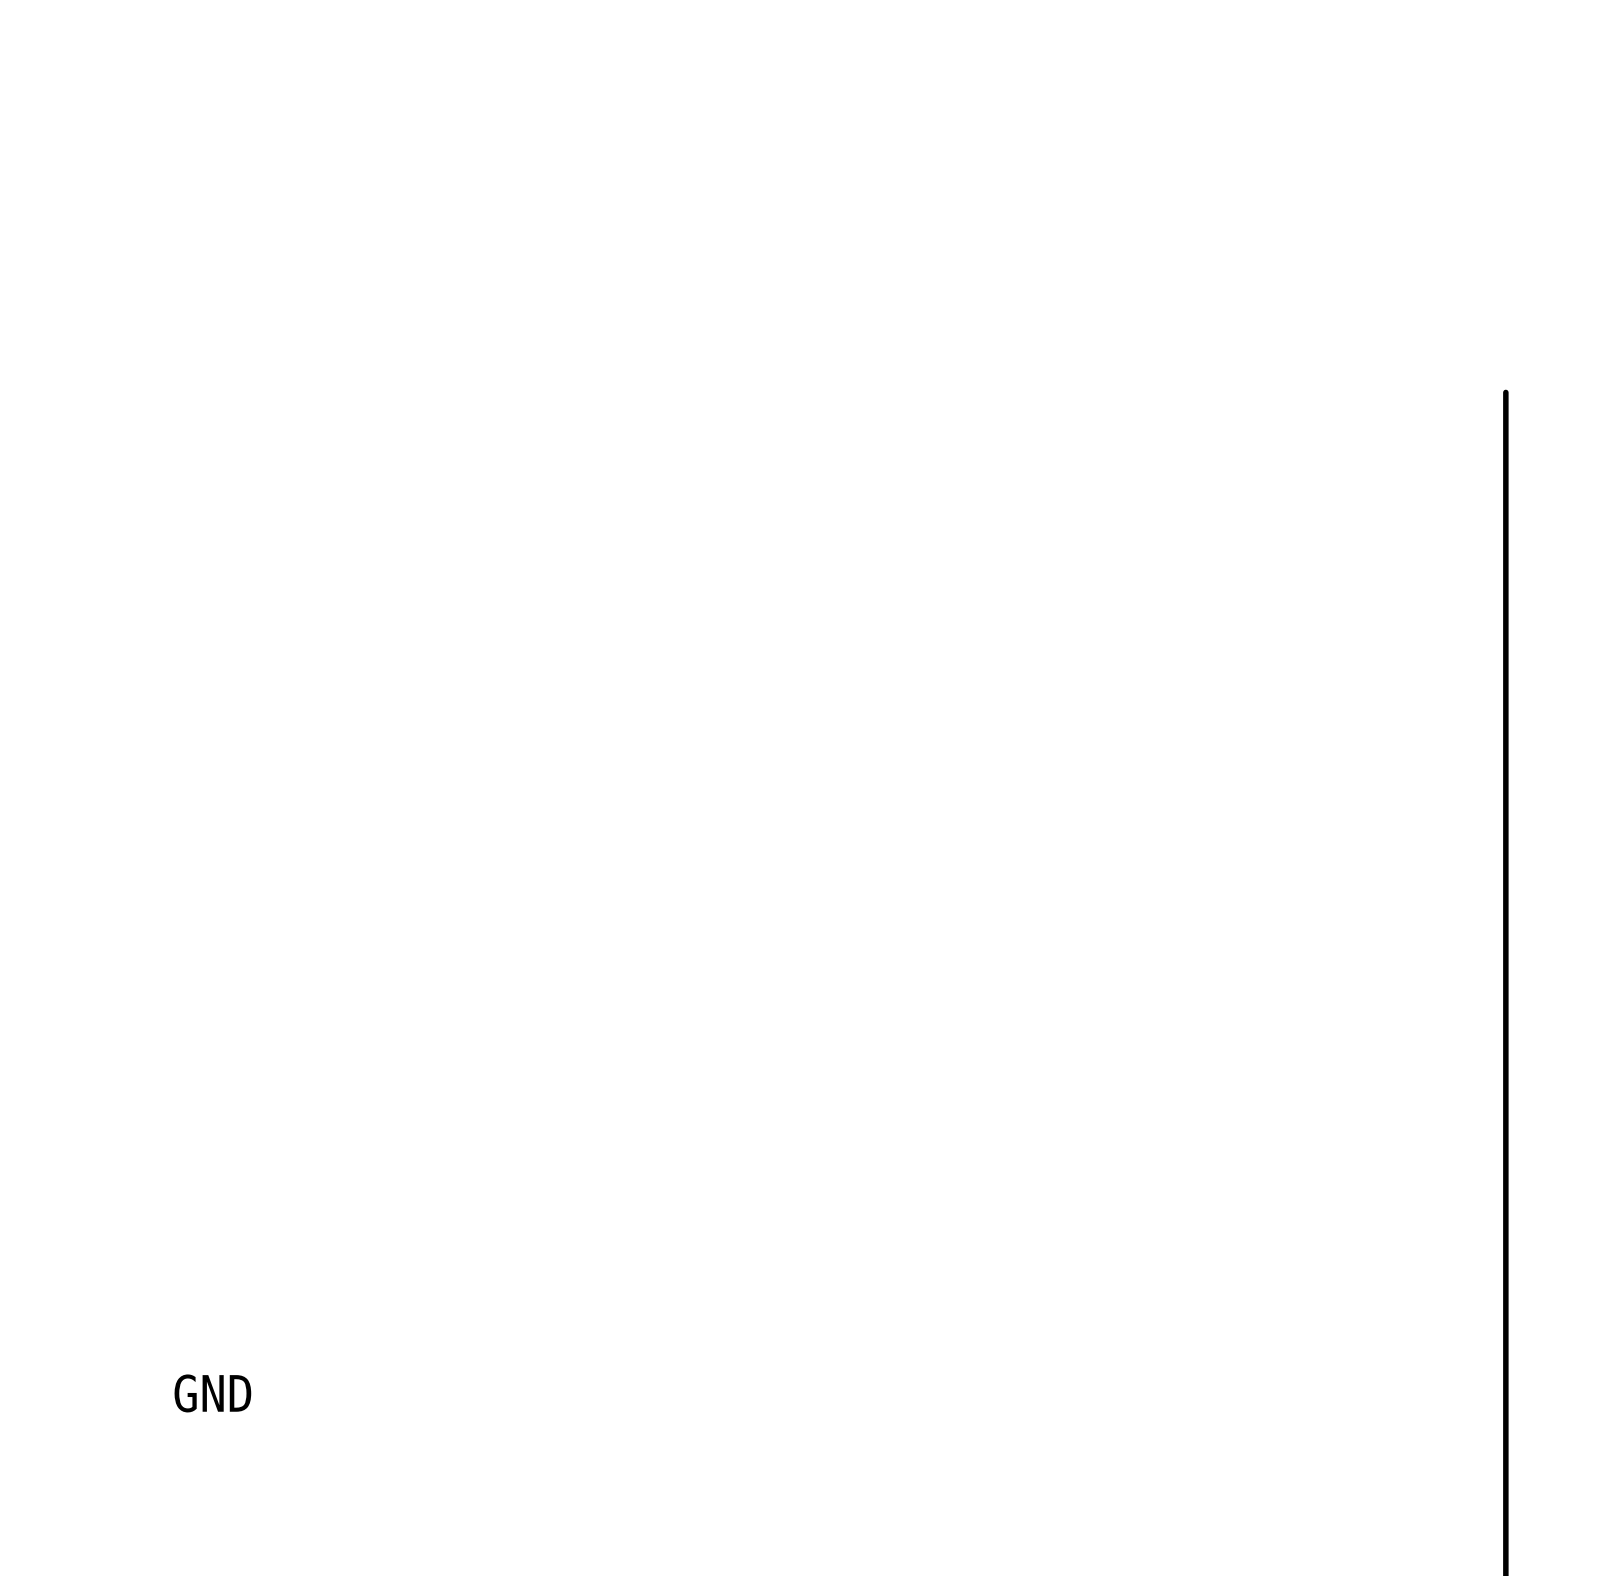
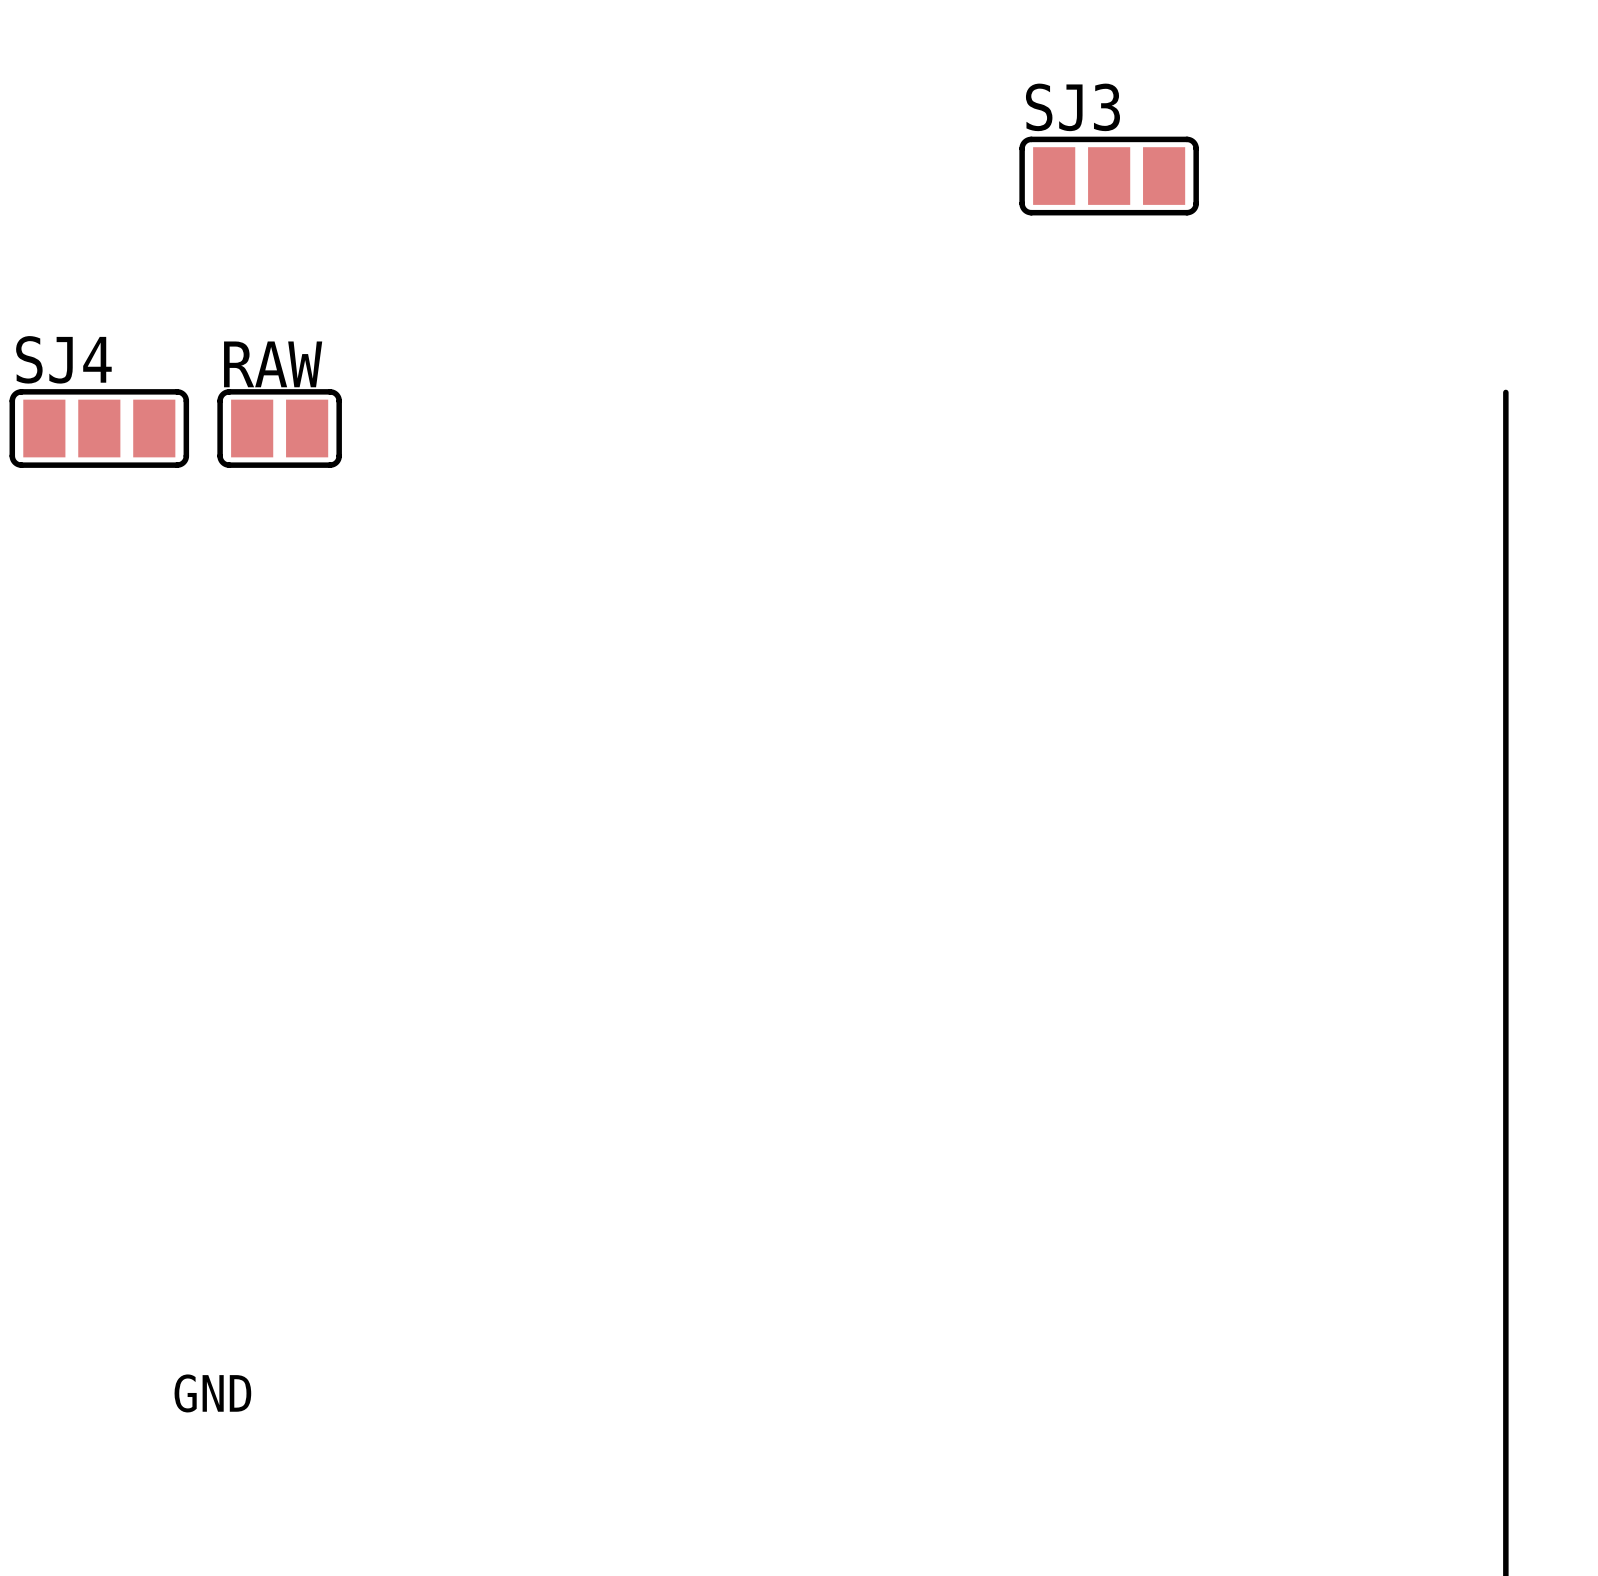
SJ3: none -> (1109, 176)
SJ4: none -> (99, 428)
RAW: none -> (279, 428)

